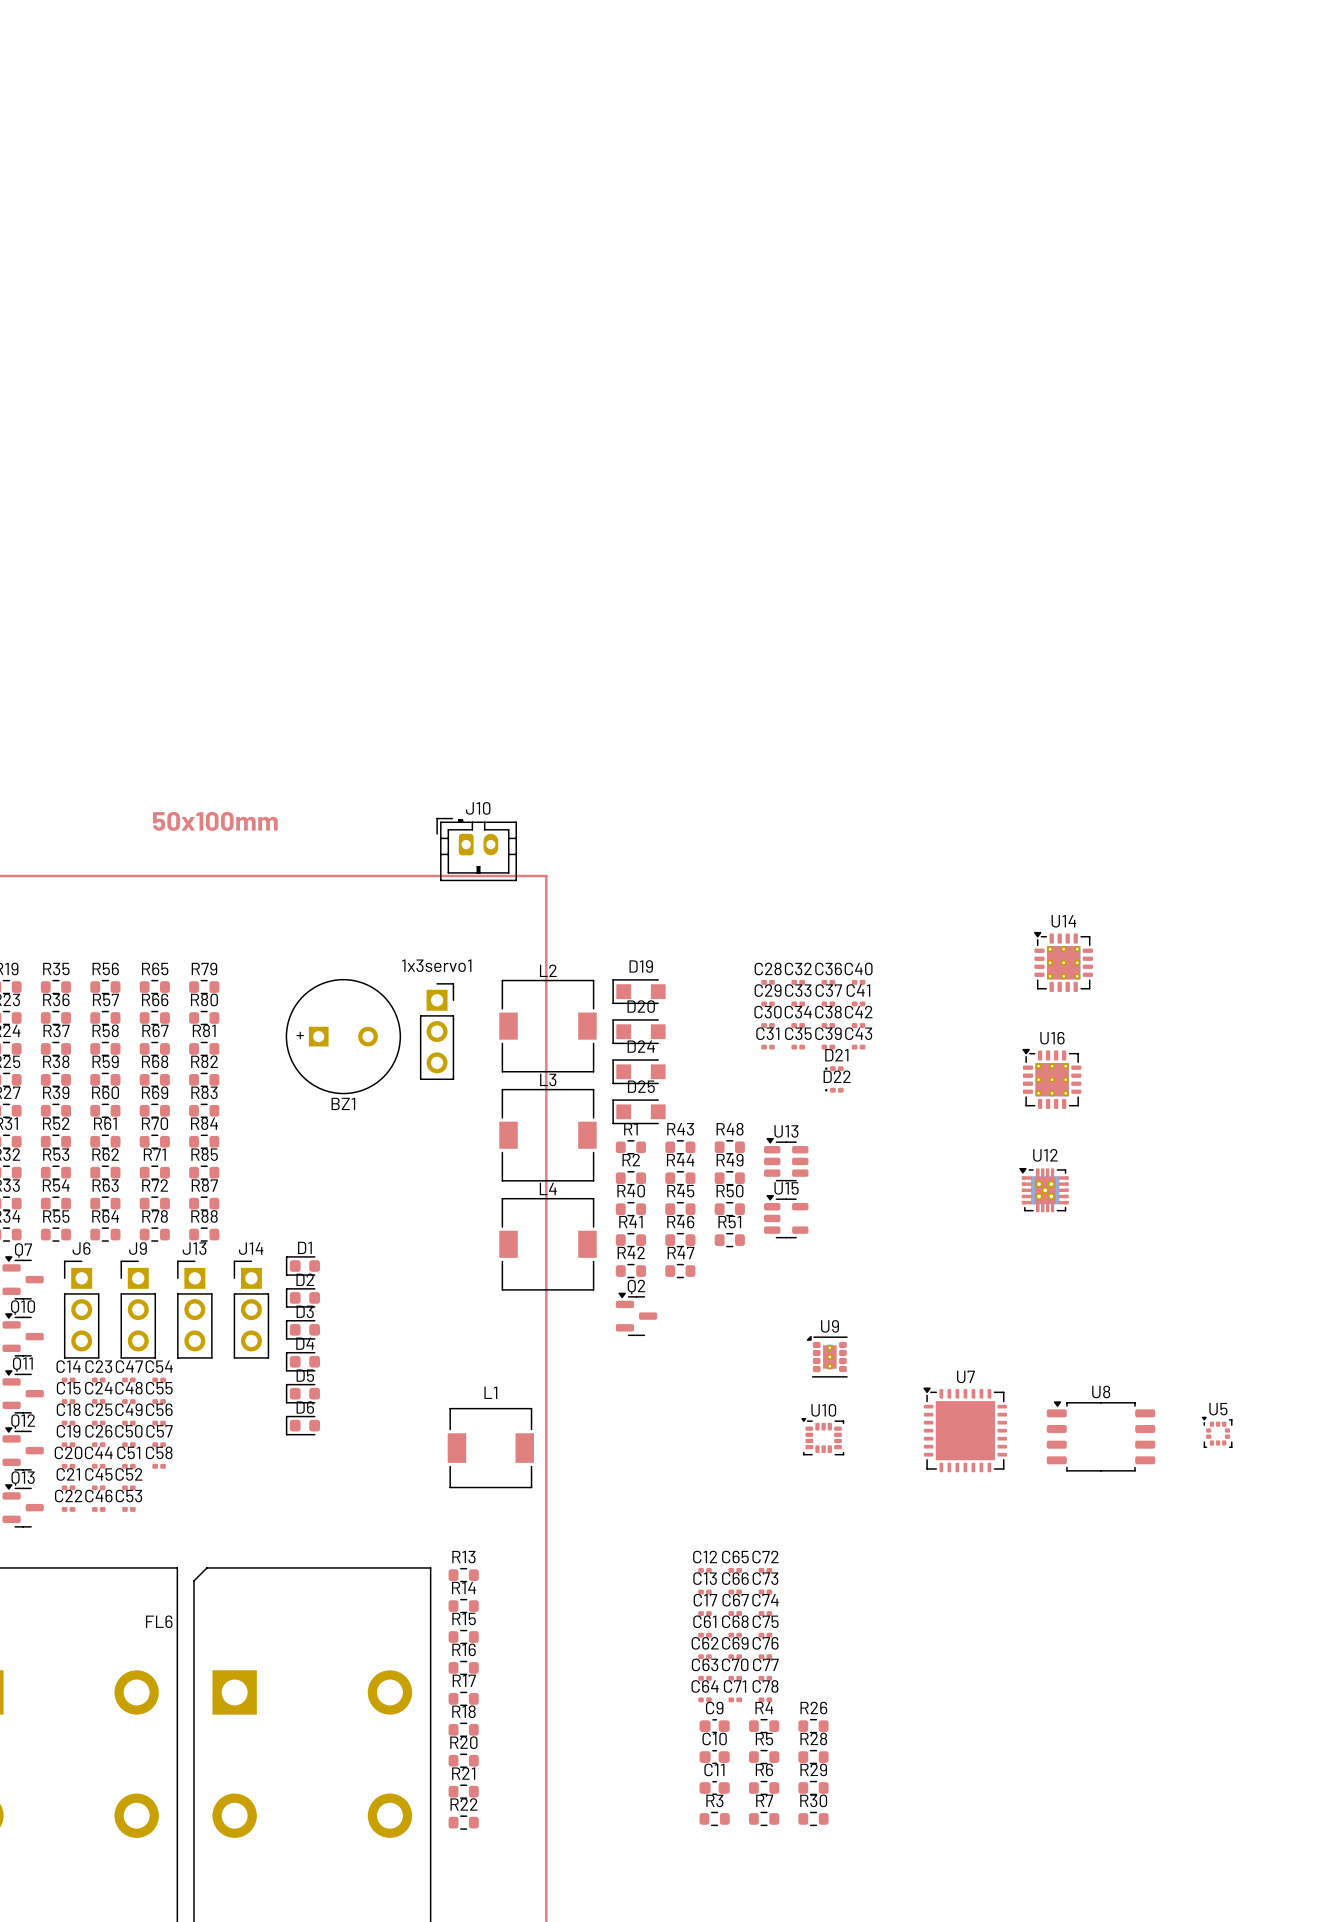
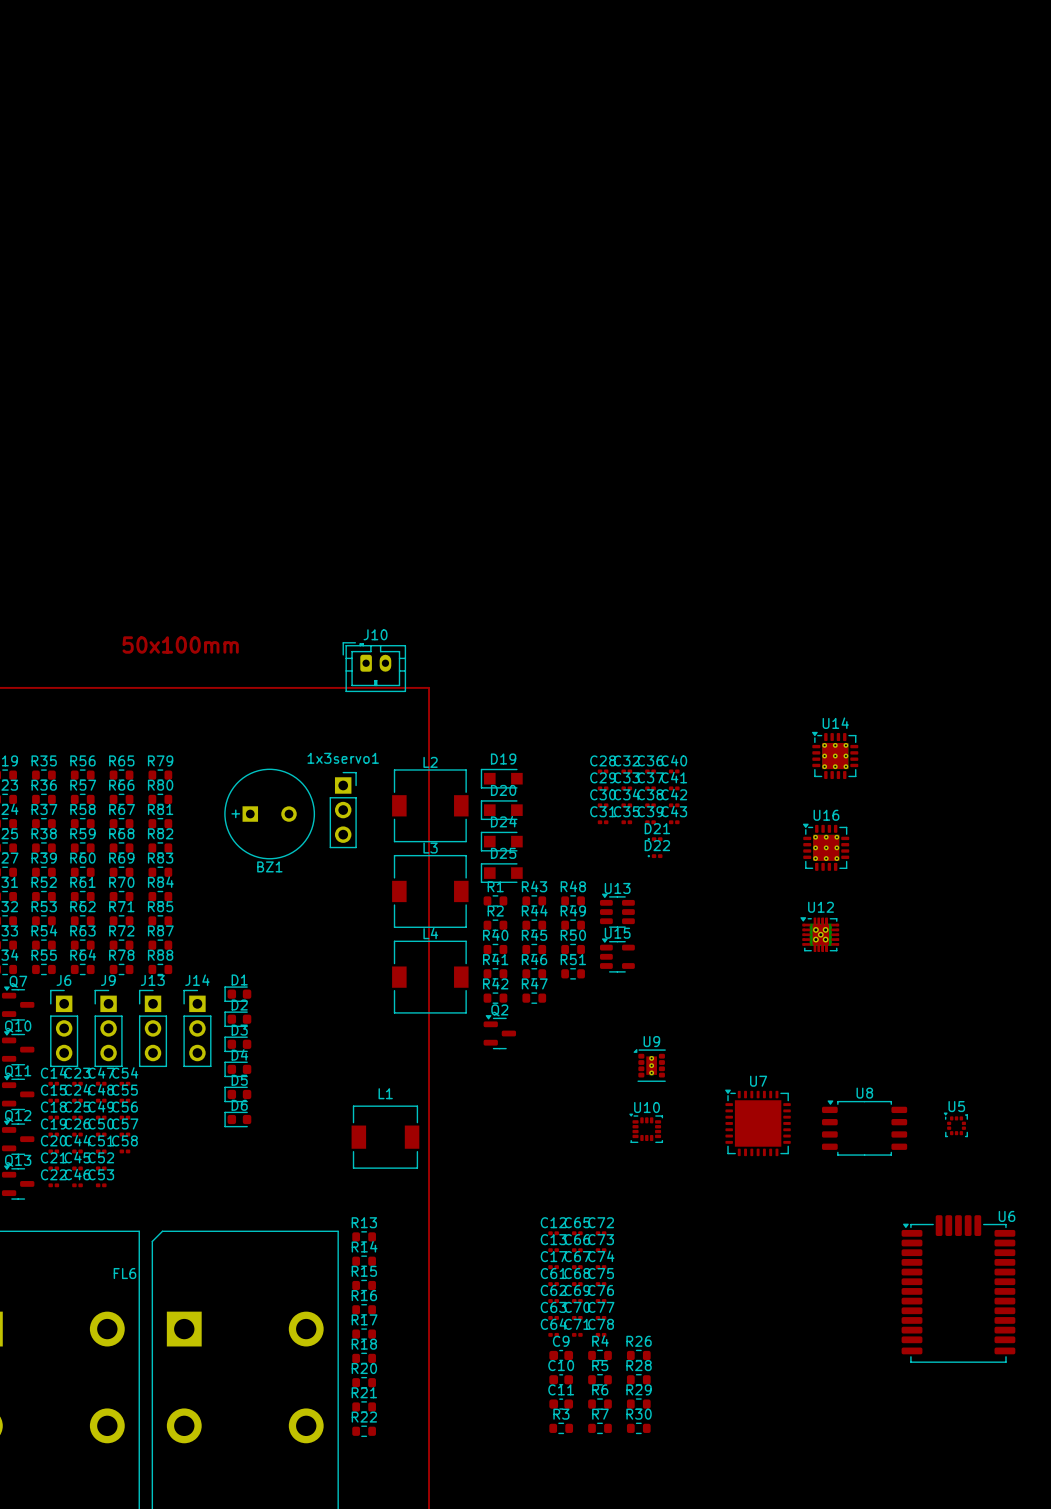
U6: none -> (958, 1288)

